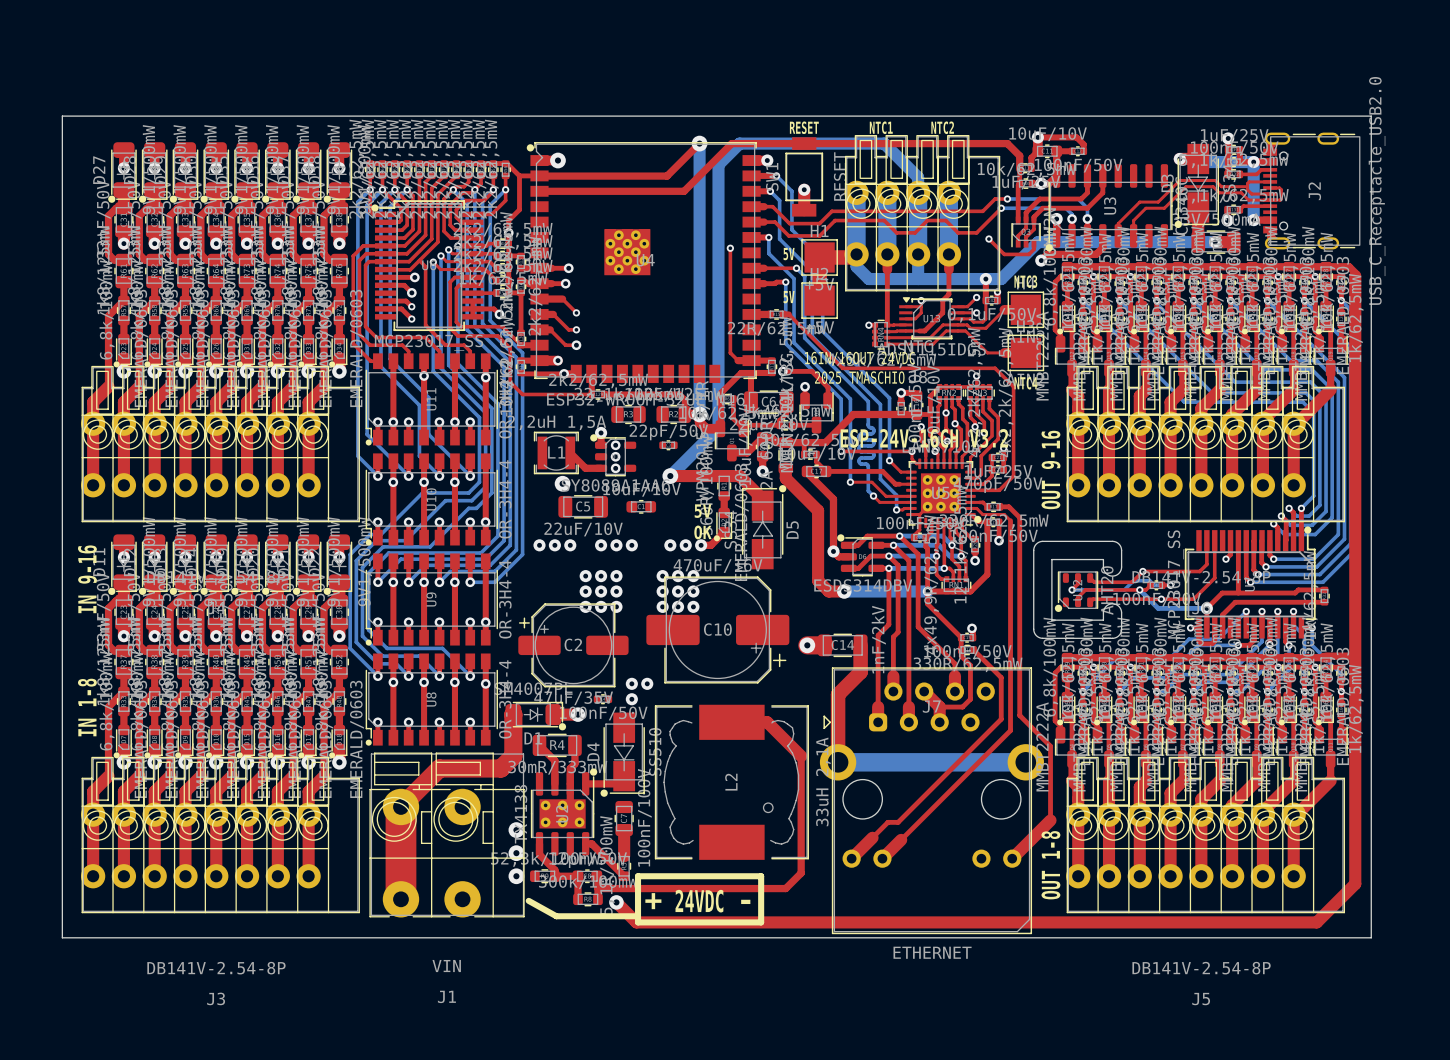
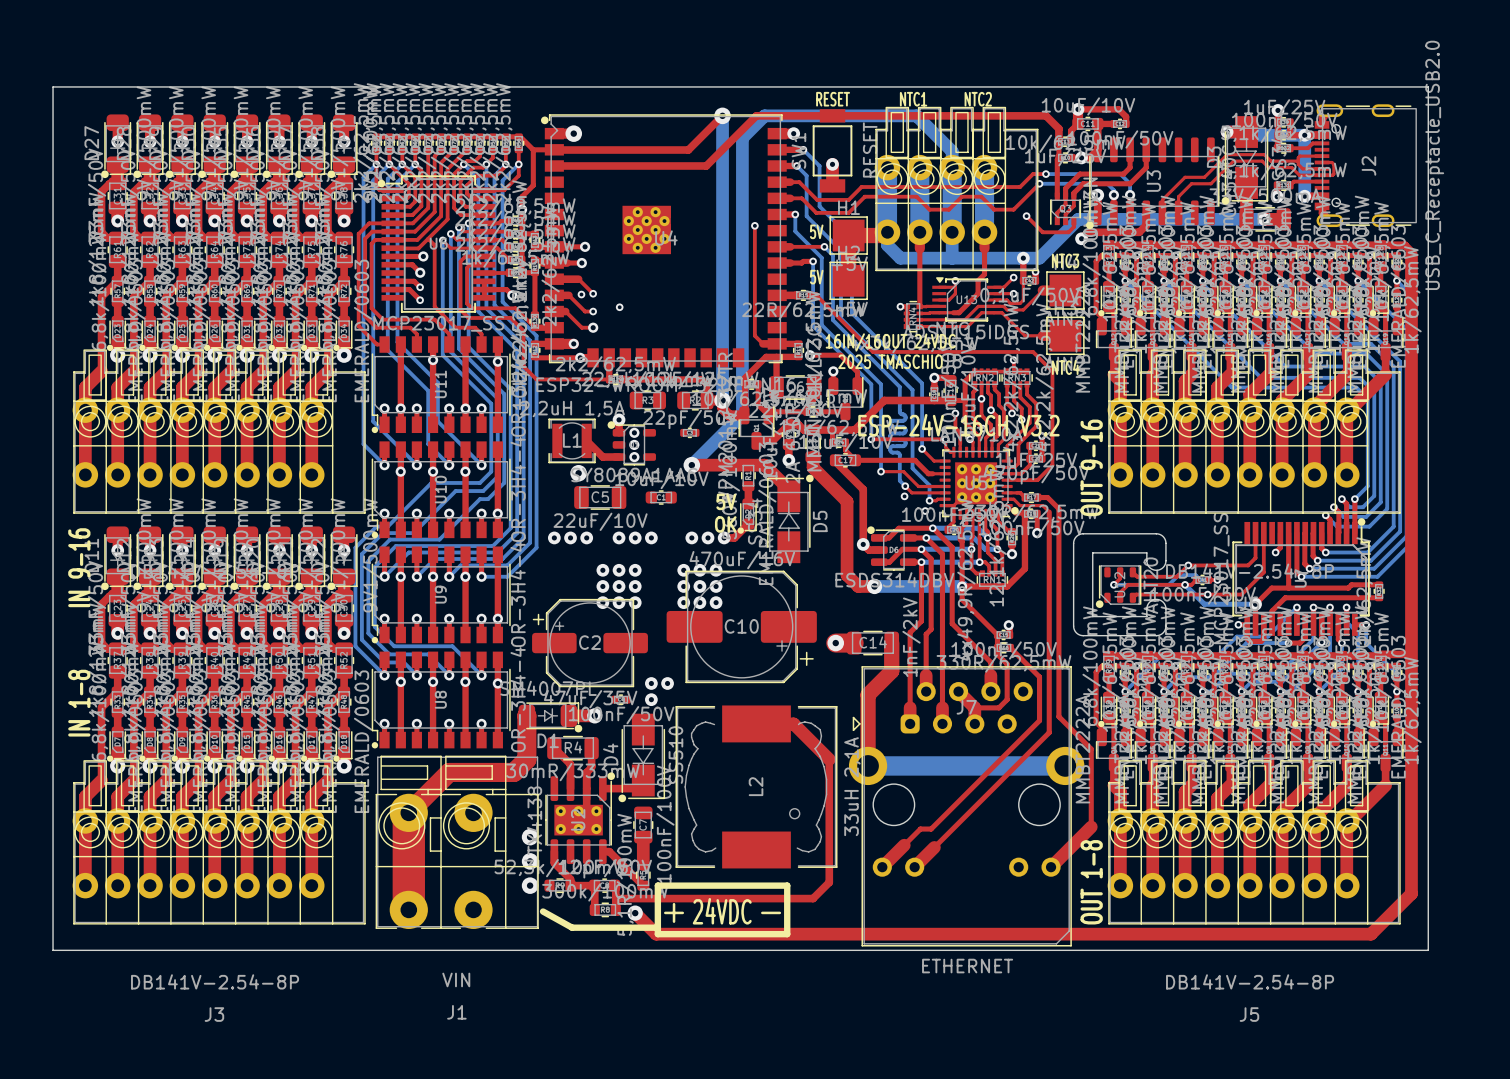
via: none -> (581, 294)
via: none -> (619, 307)
via: none -> (904, 496)
via: none -> (925, 511)

